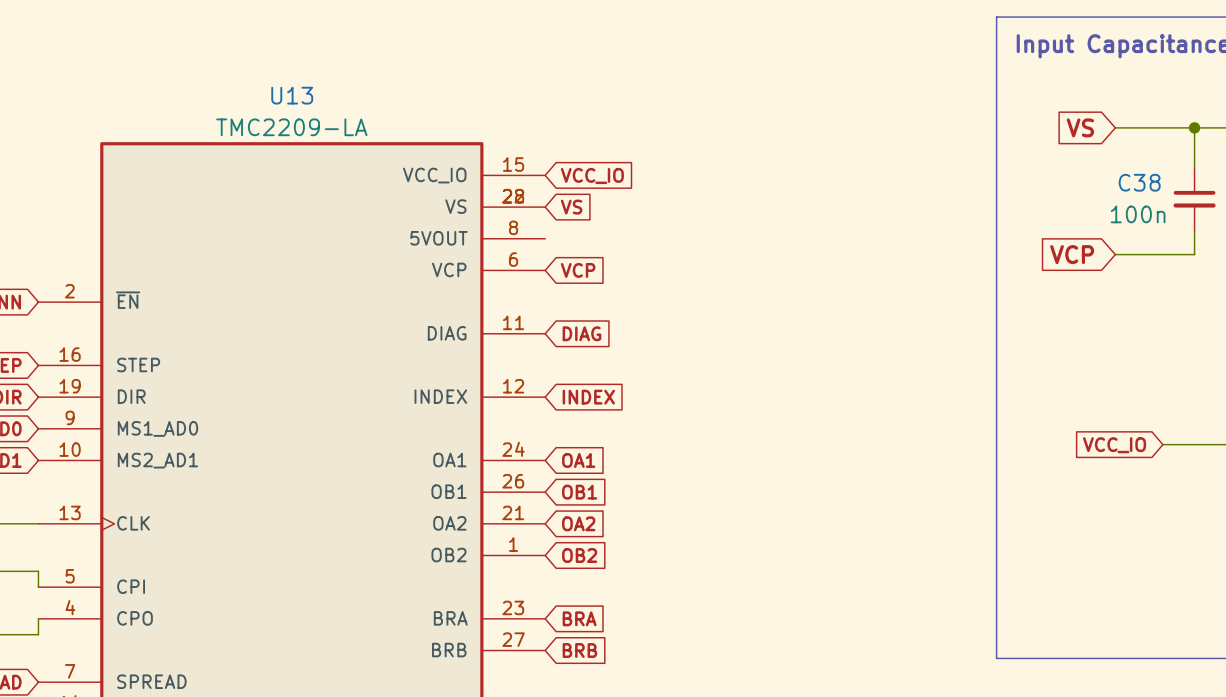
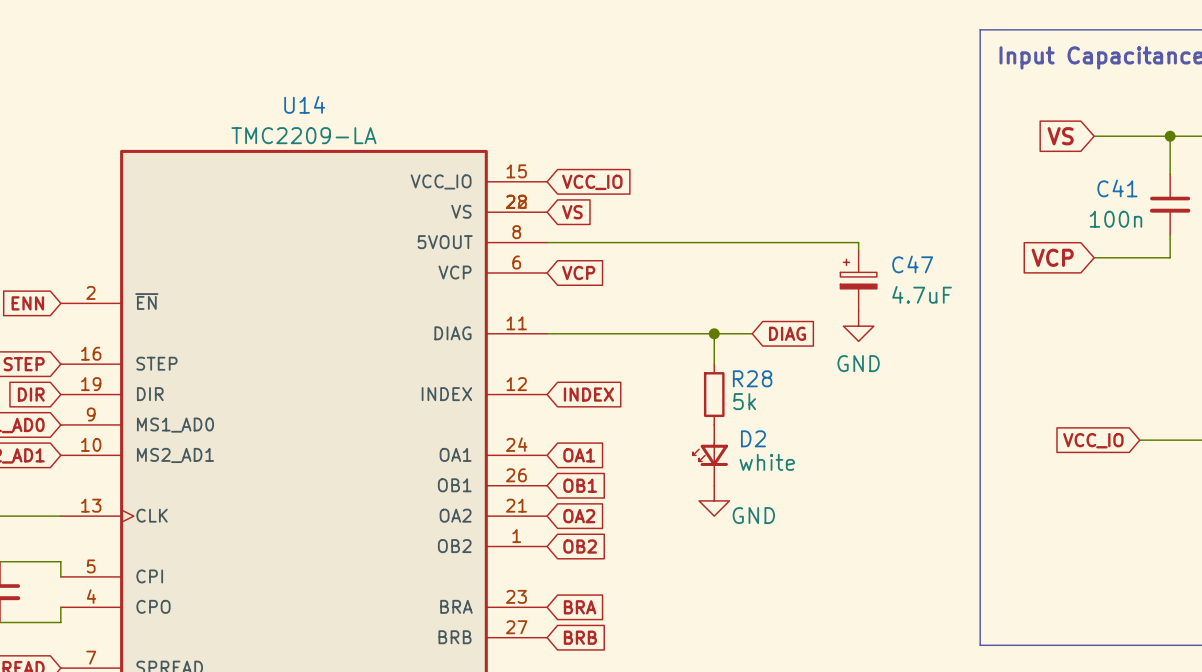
U13 name: U13 (292, 95) -> U14 (304, 104)
C38 name: C38 (1139, 182) -> C41 (1117, 188)
wire: none -> (547, 242) (858, 242) (858, 250)
C47: none -> 4.7uF (858, 280)
power symbol: none -> GND (858, 326)
wire: none -> (547, 333) (752, 333)
global label position: DIAG (581, 333) -> DIAG (787, 333)
wire: none -> (714, 333) (714, 364)
junction: none -> (714, 333)
R28: none -> 5k (714, 394)
D2: none -> white (710, 455)
power symbol: none -> GND (714, 500)

